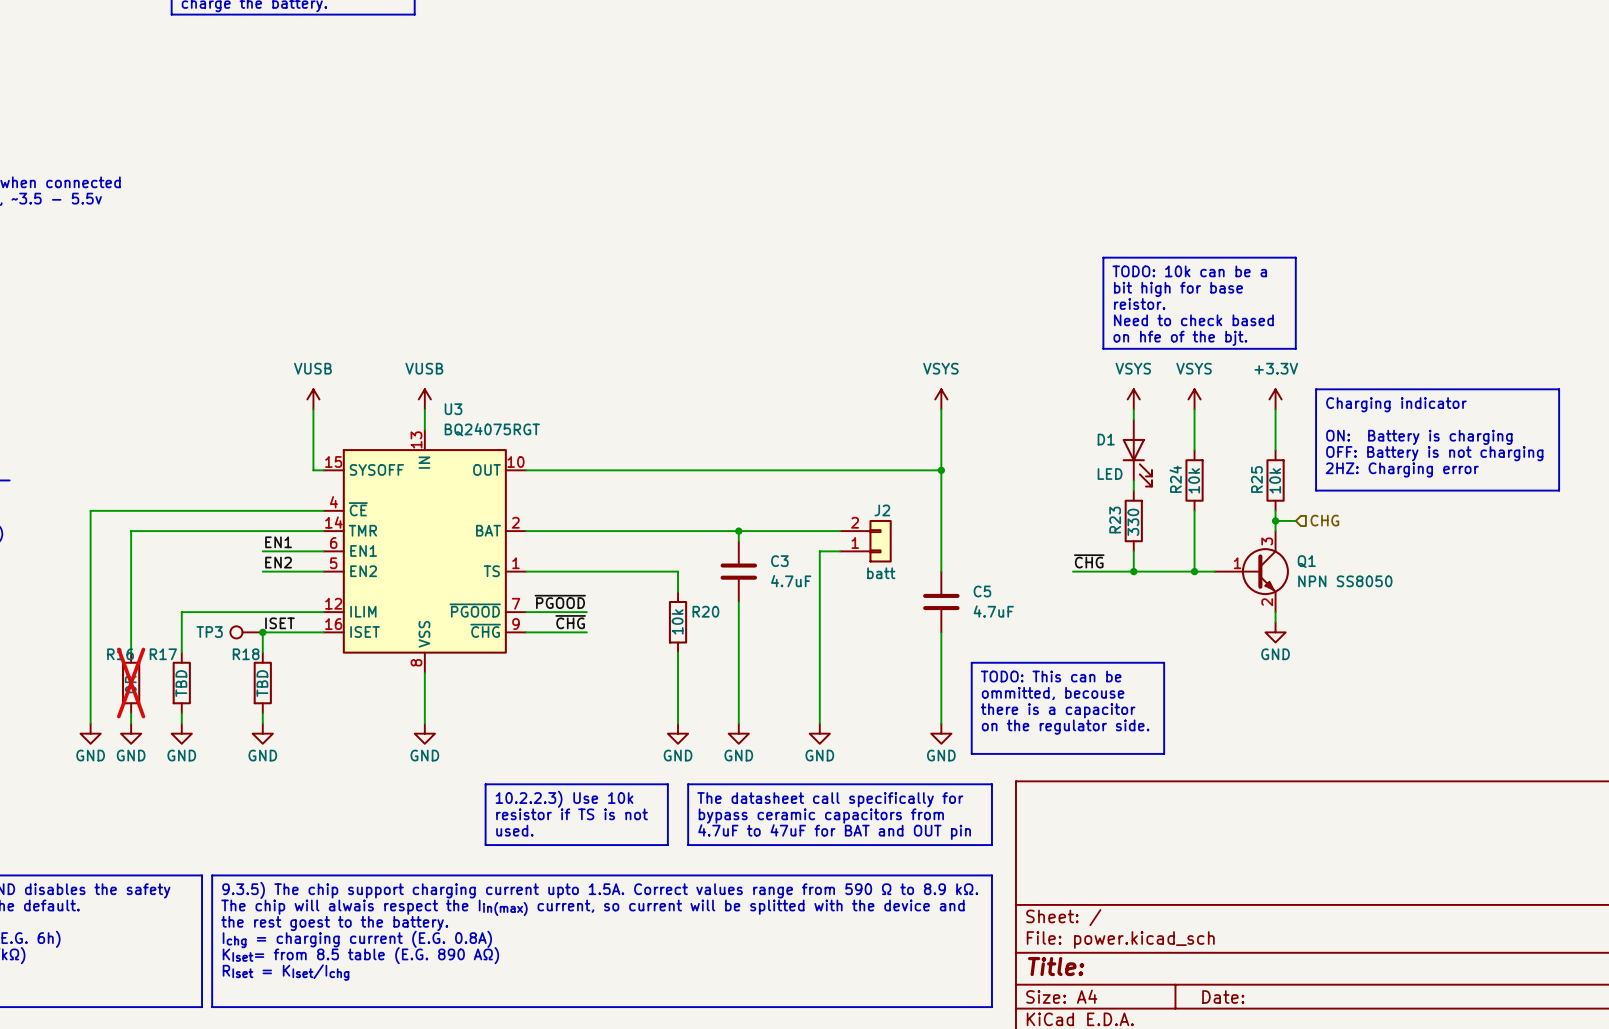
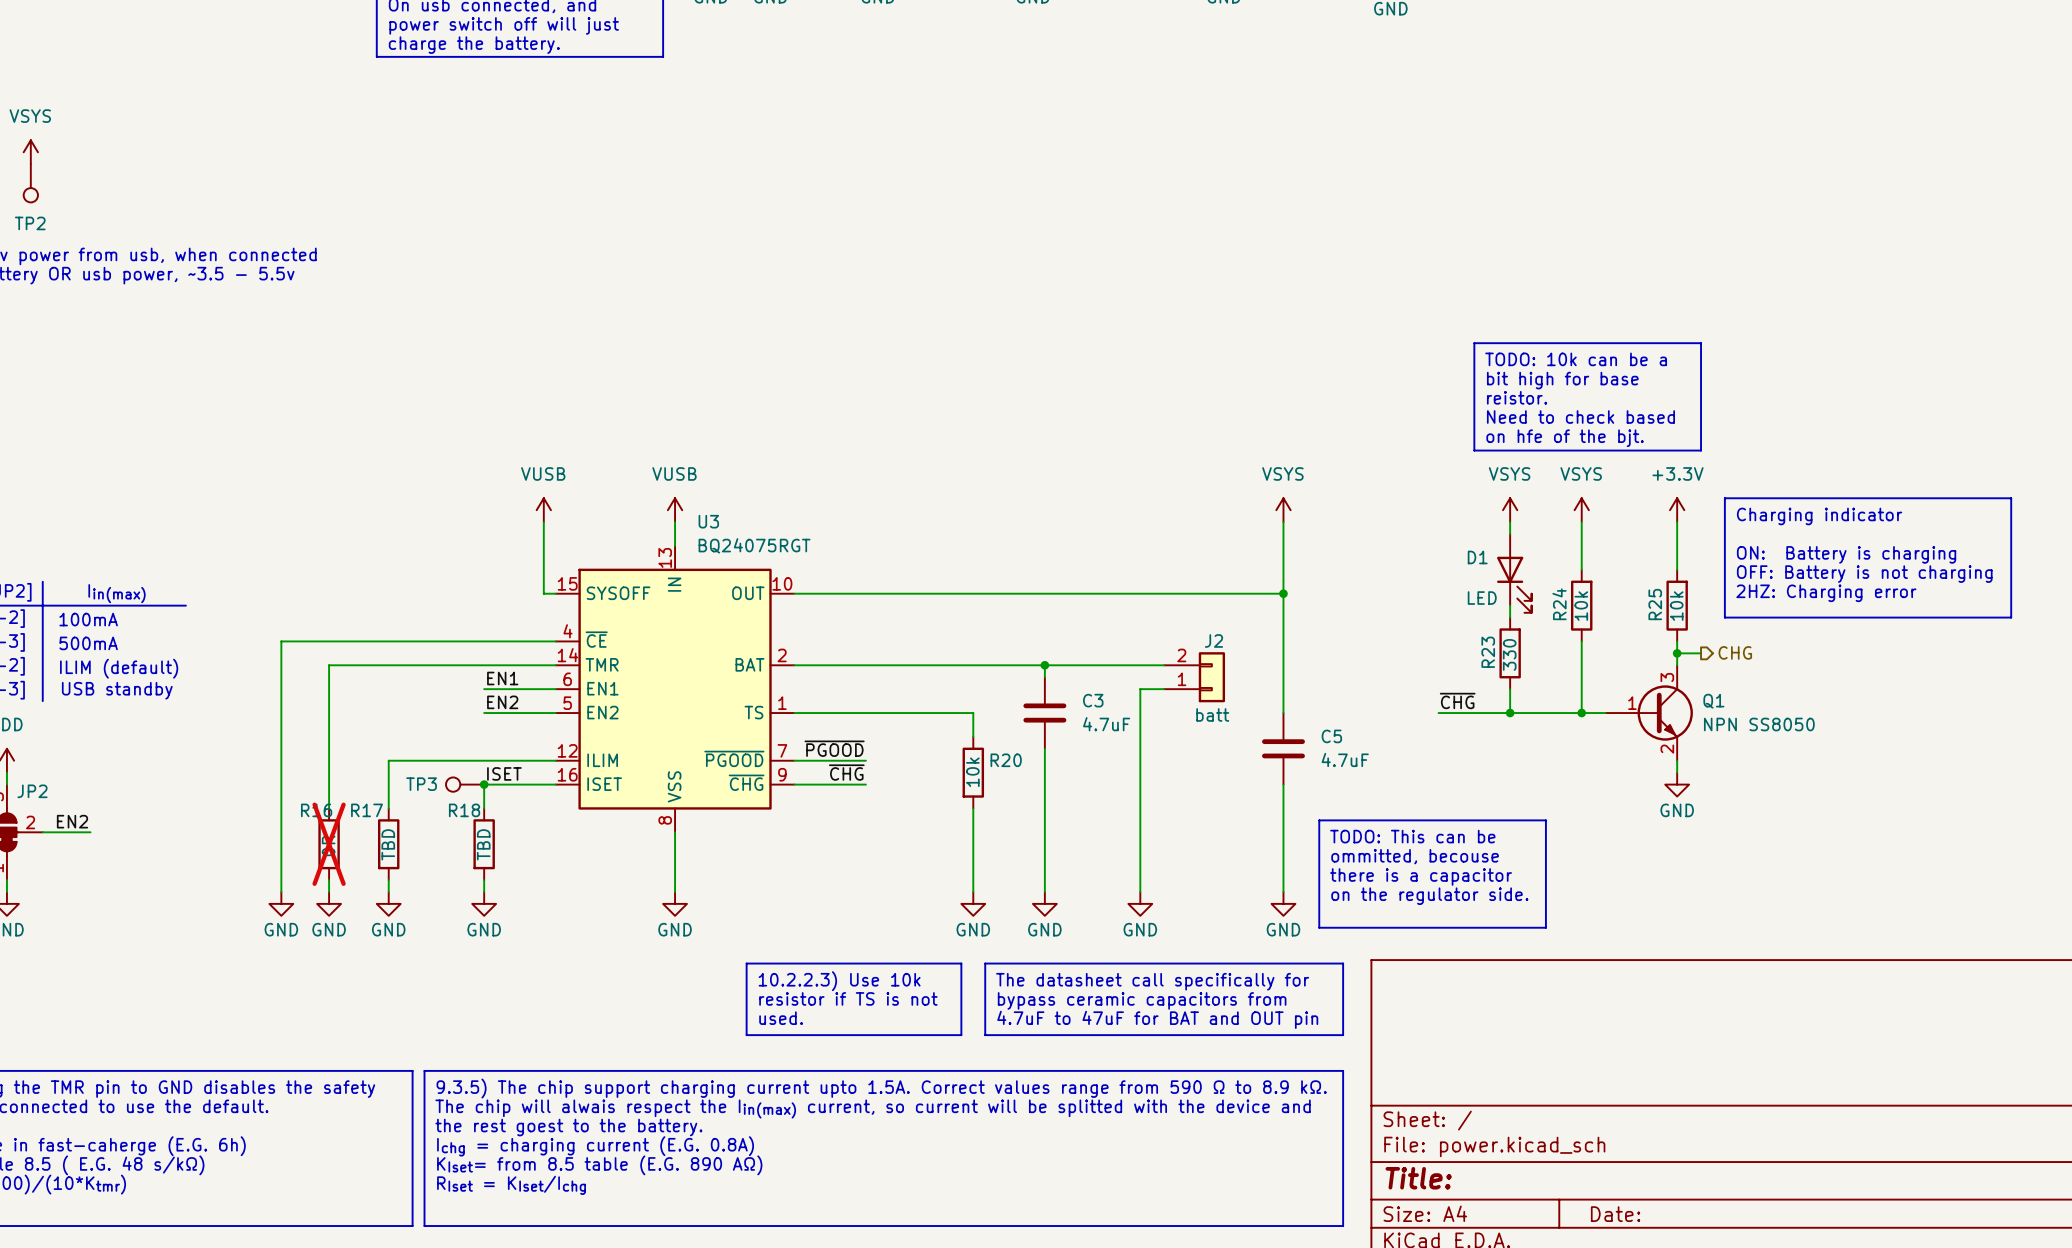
hierarchical label shape: input (1324, 520) -> output (1735, 652)

